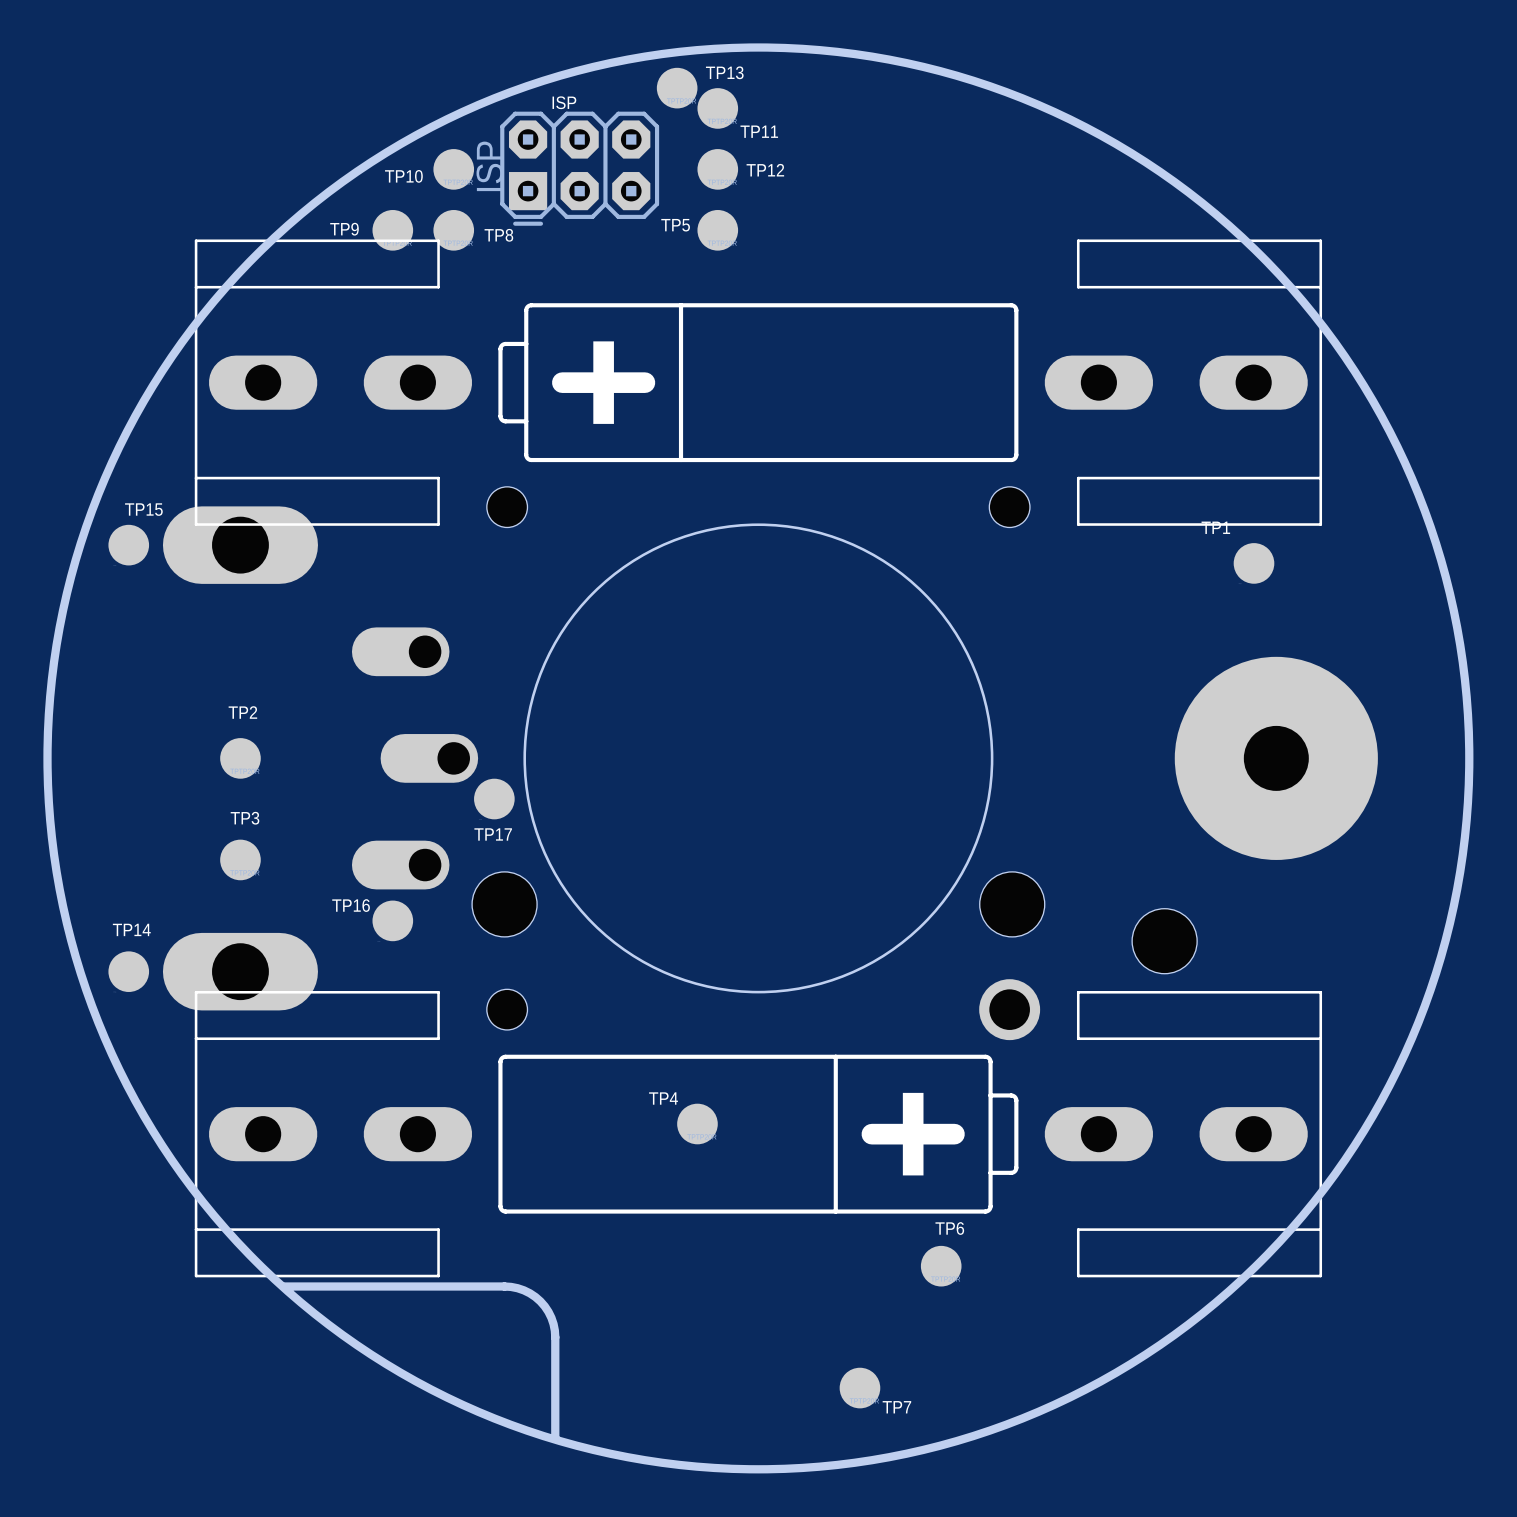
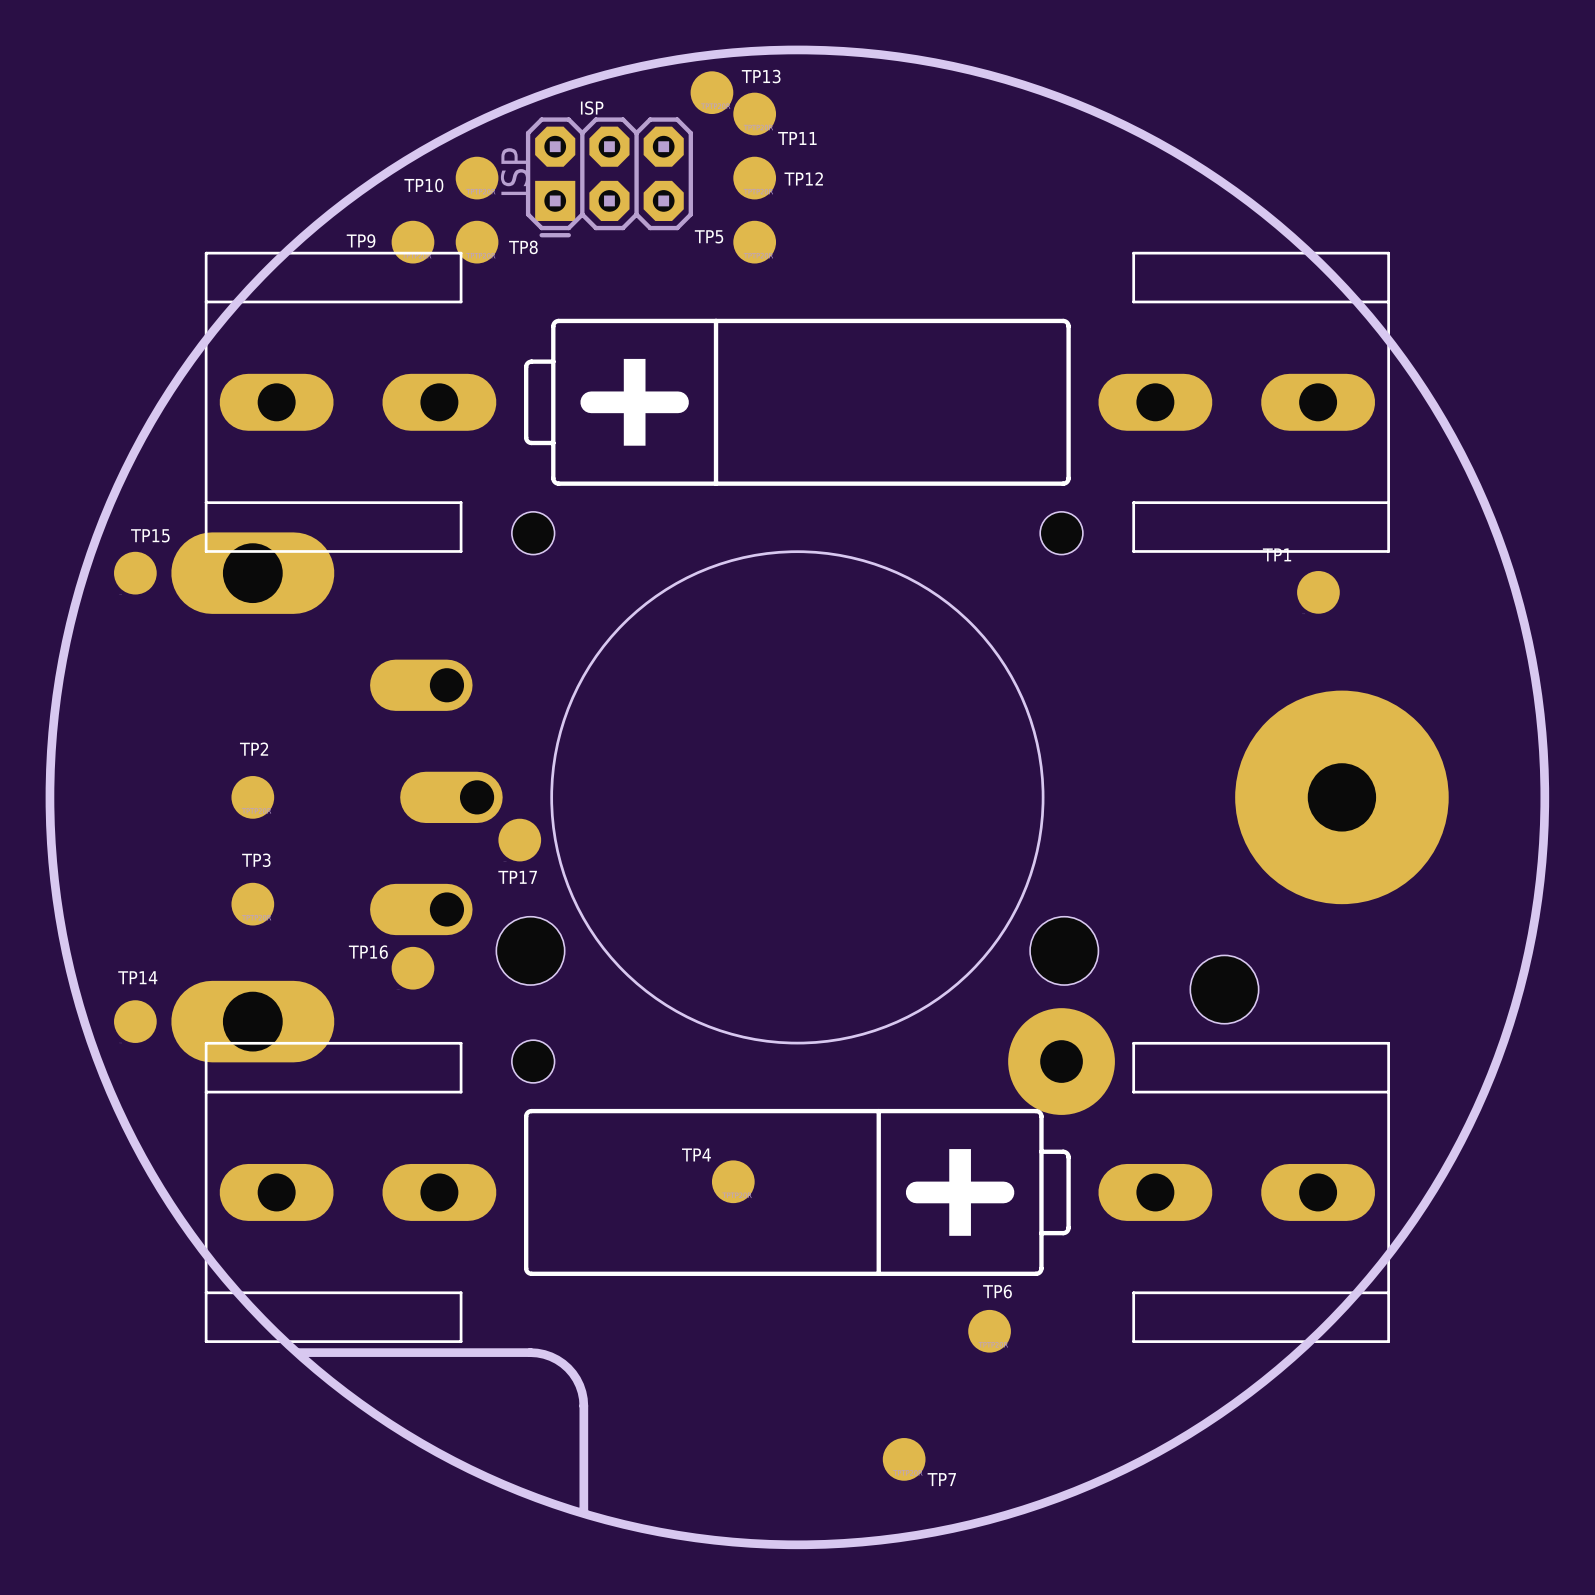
part footprint: [472, 486, 1045, 1041] -> [496, 511, 1115, 1115]

